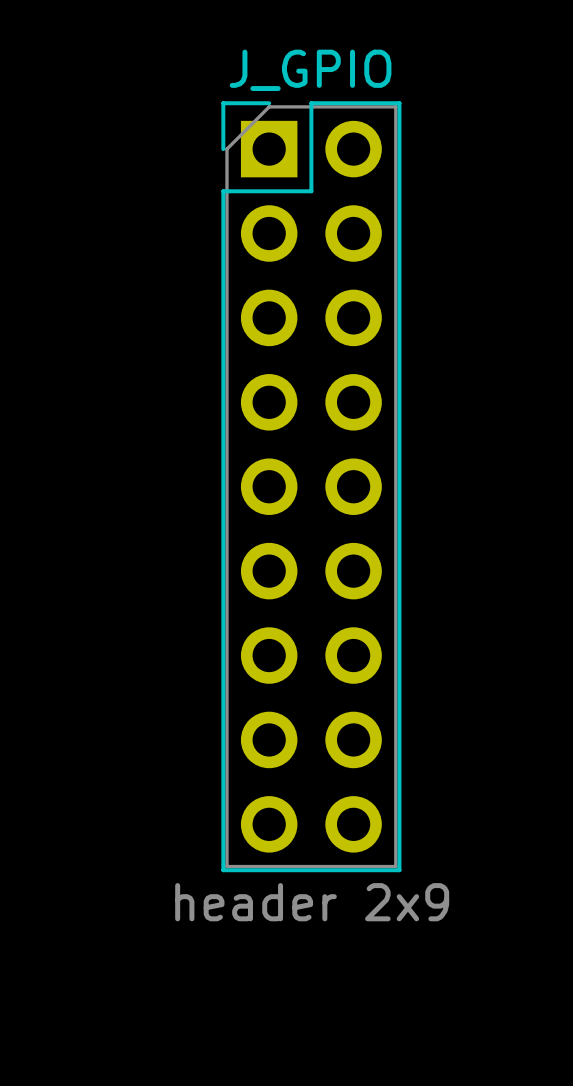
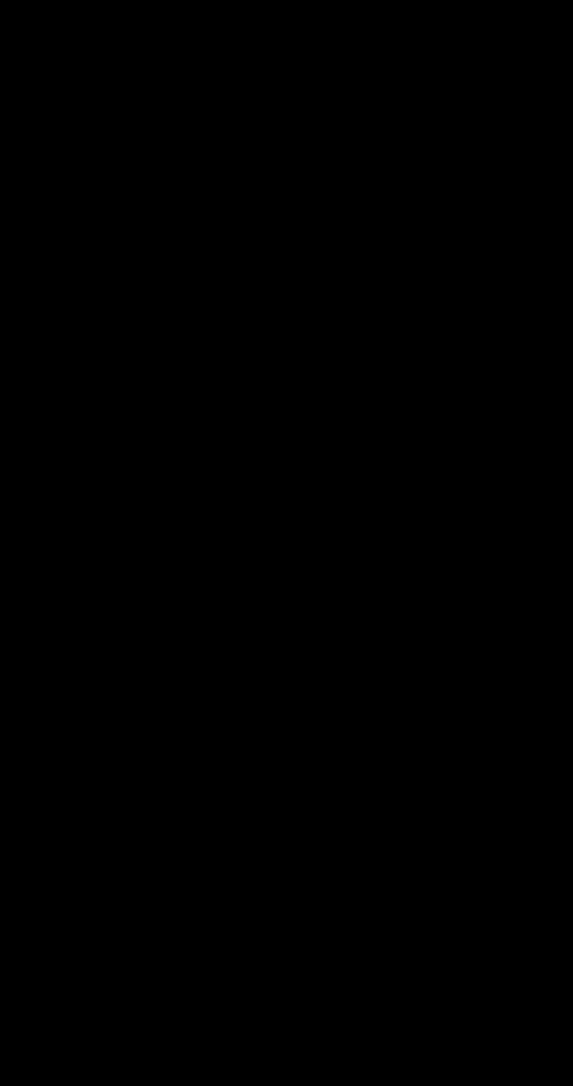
J_GPIO: header 2x9 (311, 486) -> none

